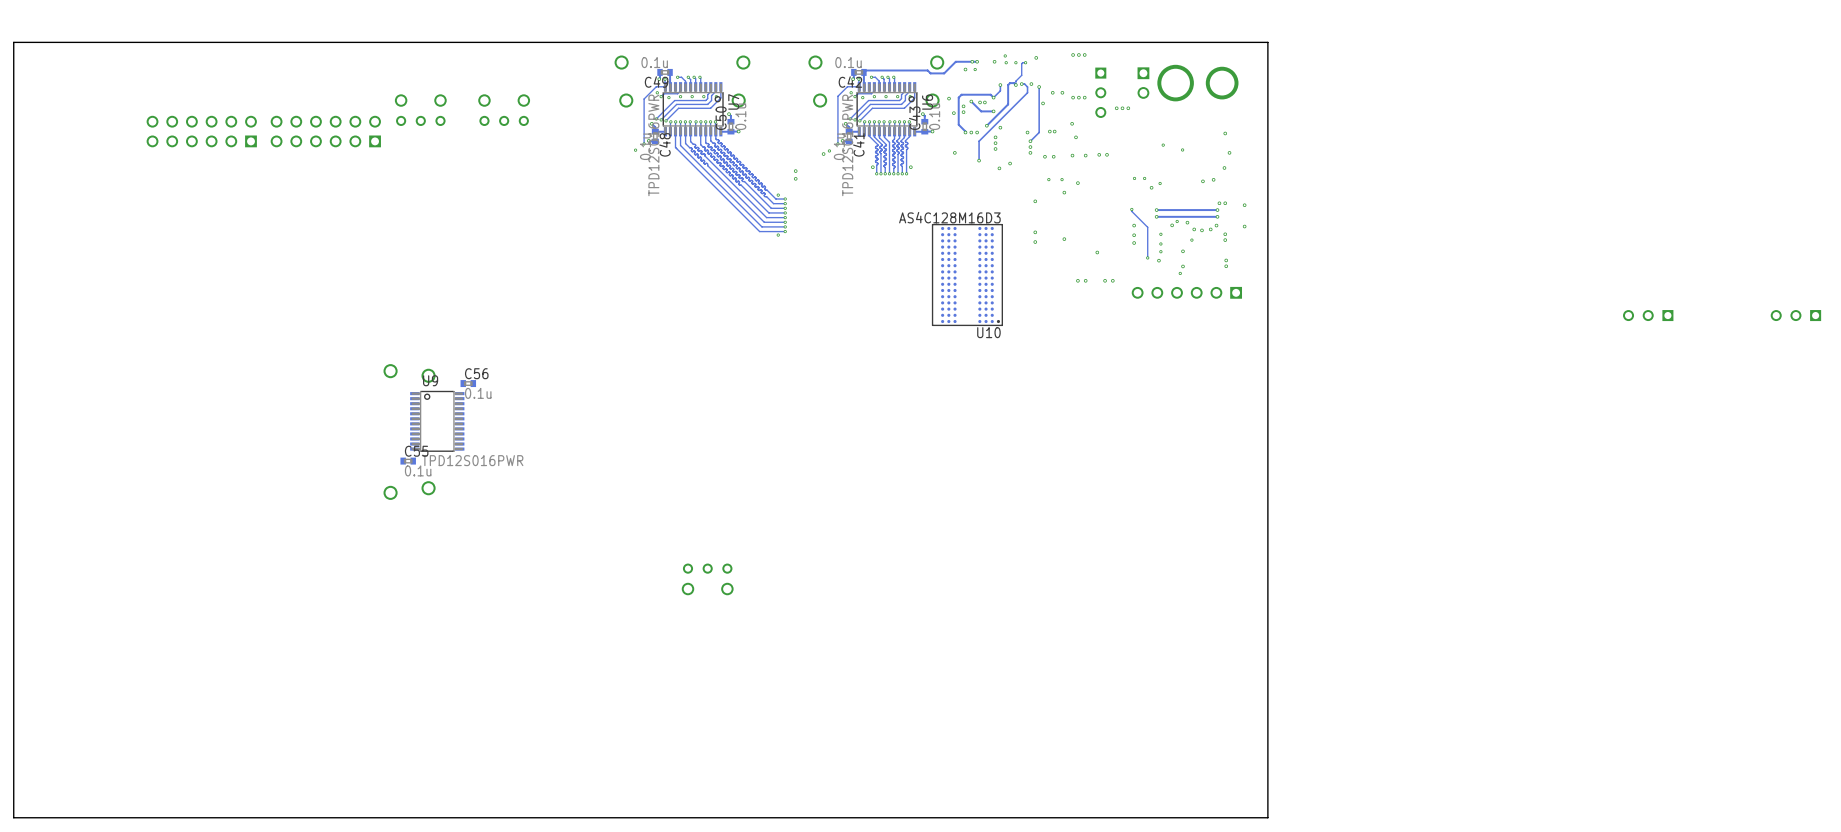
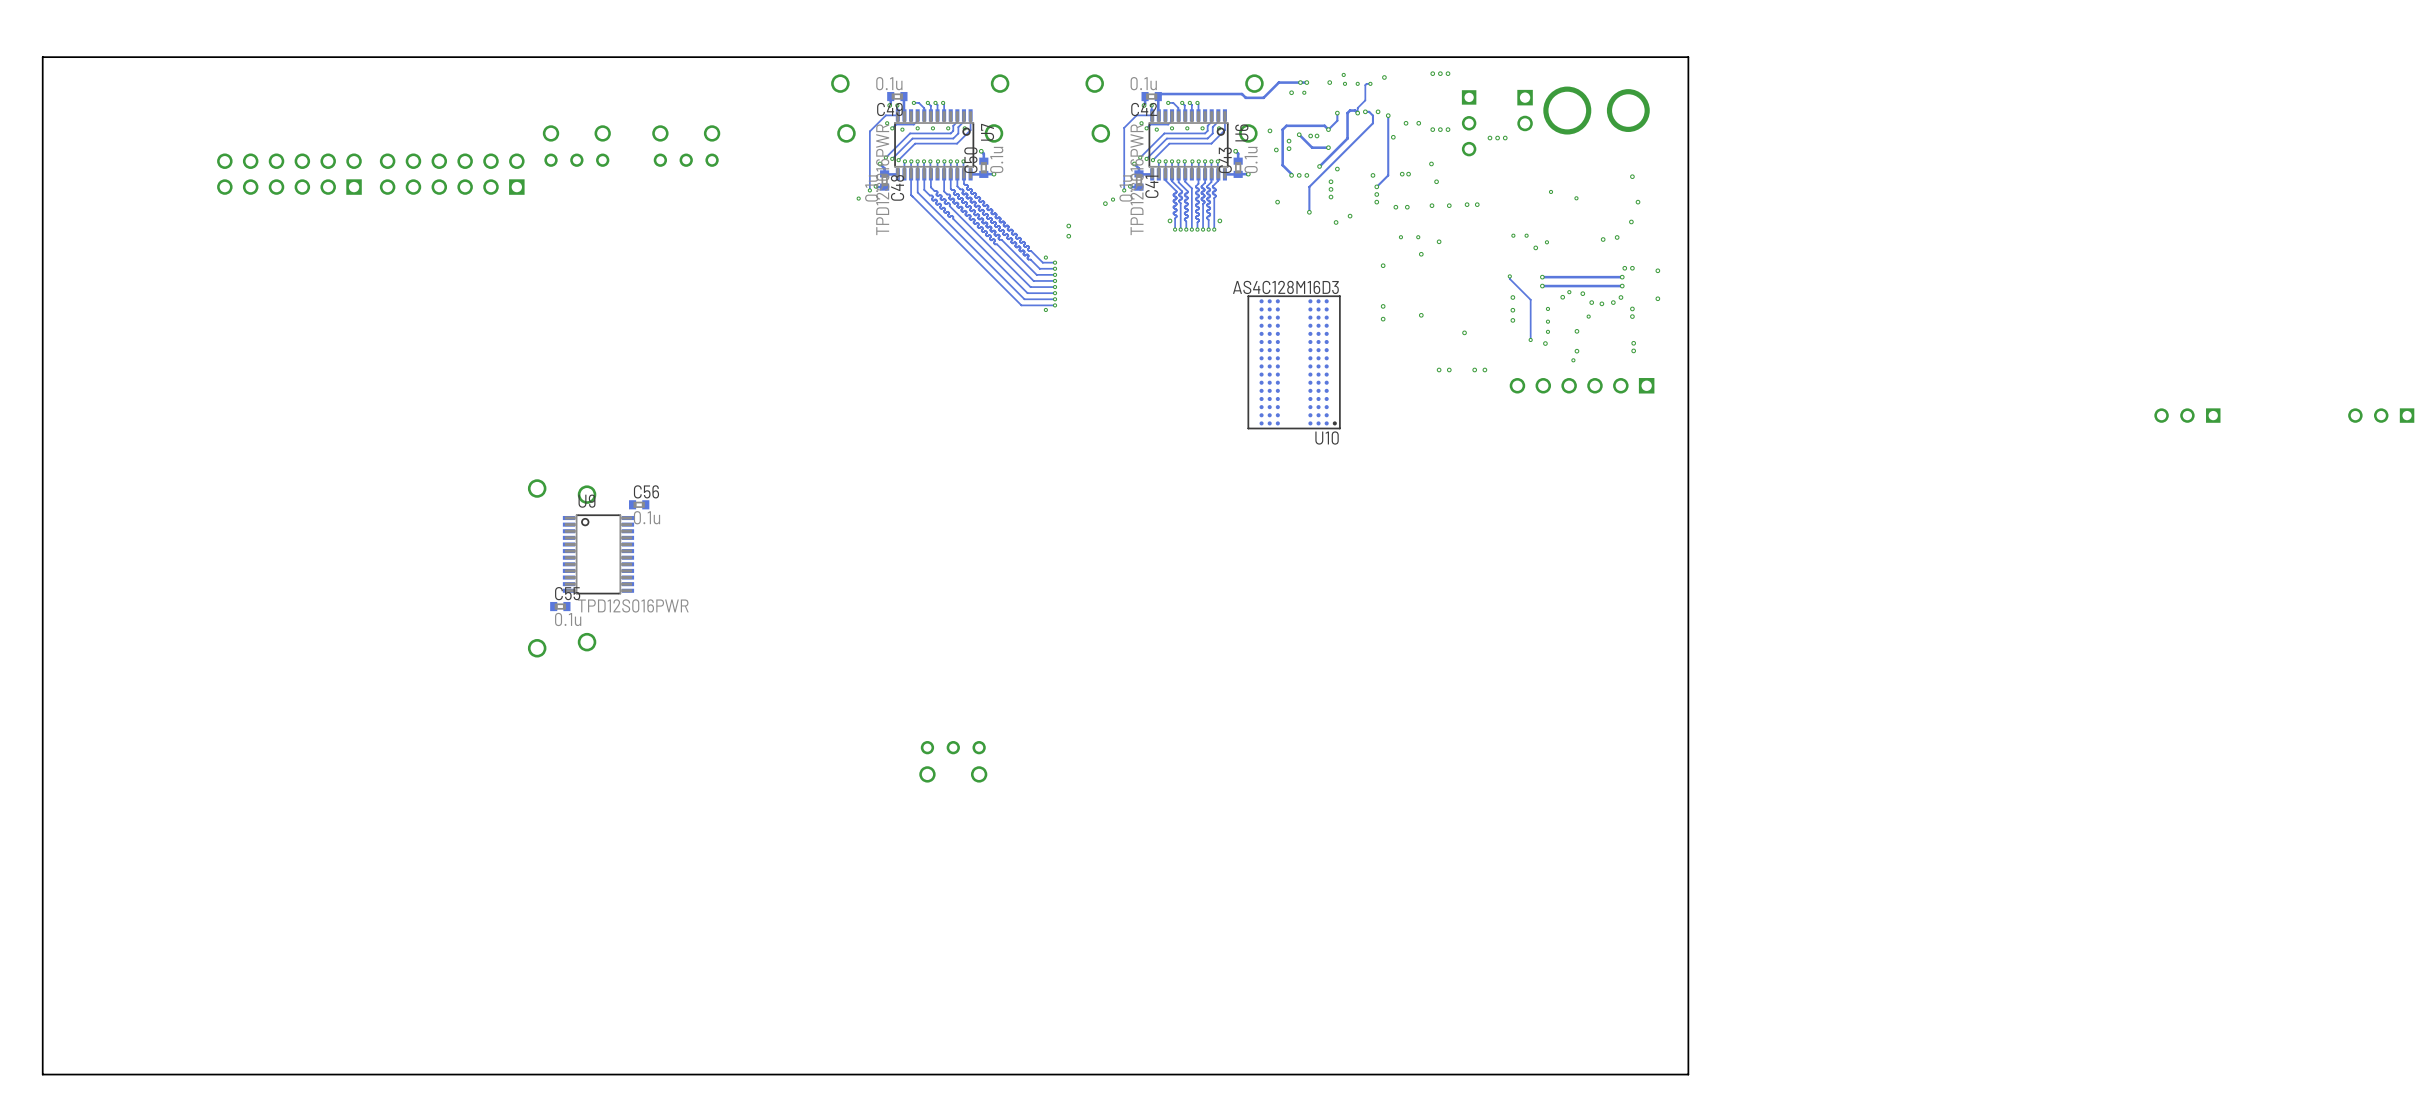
via: none -> (1489, 138)
via: none -> (1497, 138)
via: none -> (1505, 138)
via: (1116, 108) -> none
via: (1122, 108) -> none
via: (1128, 108) -> none

